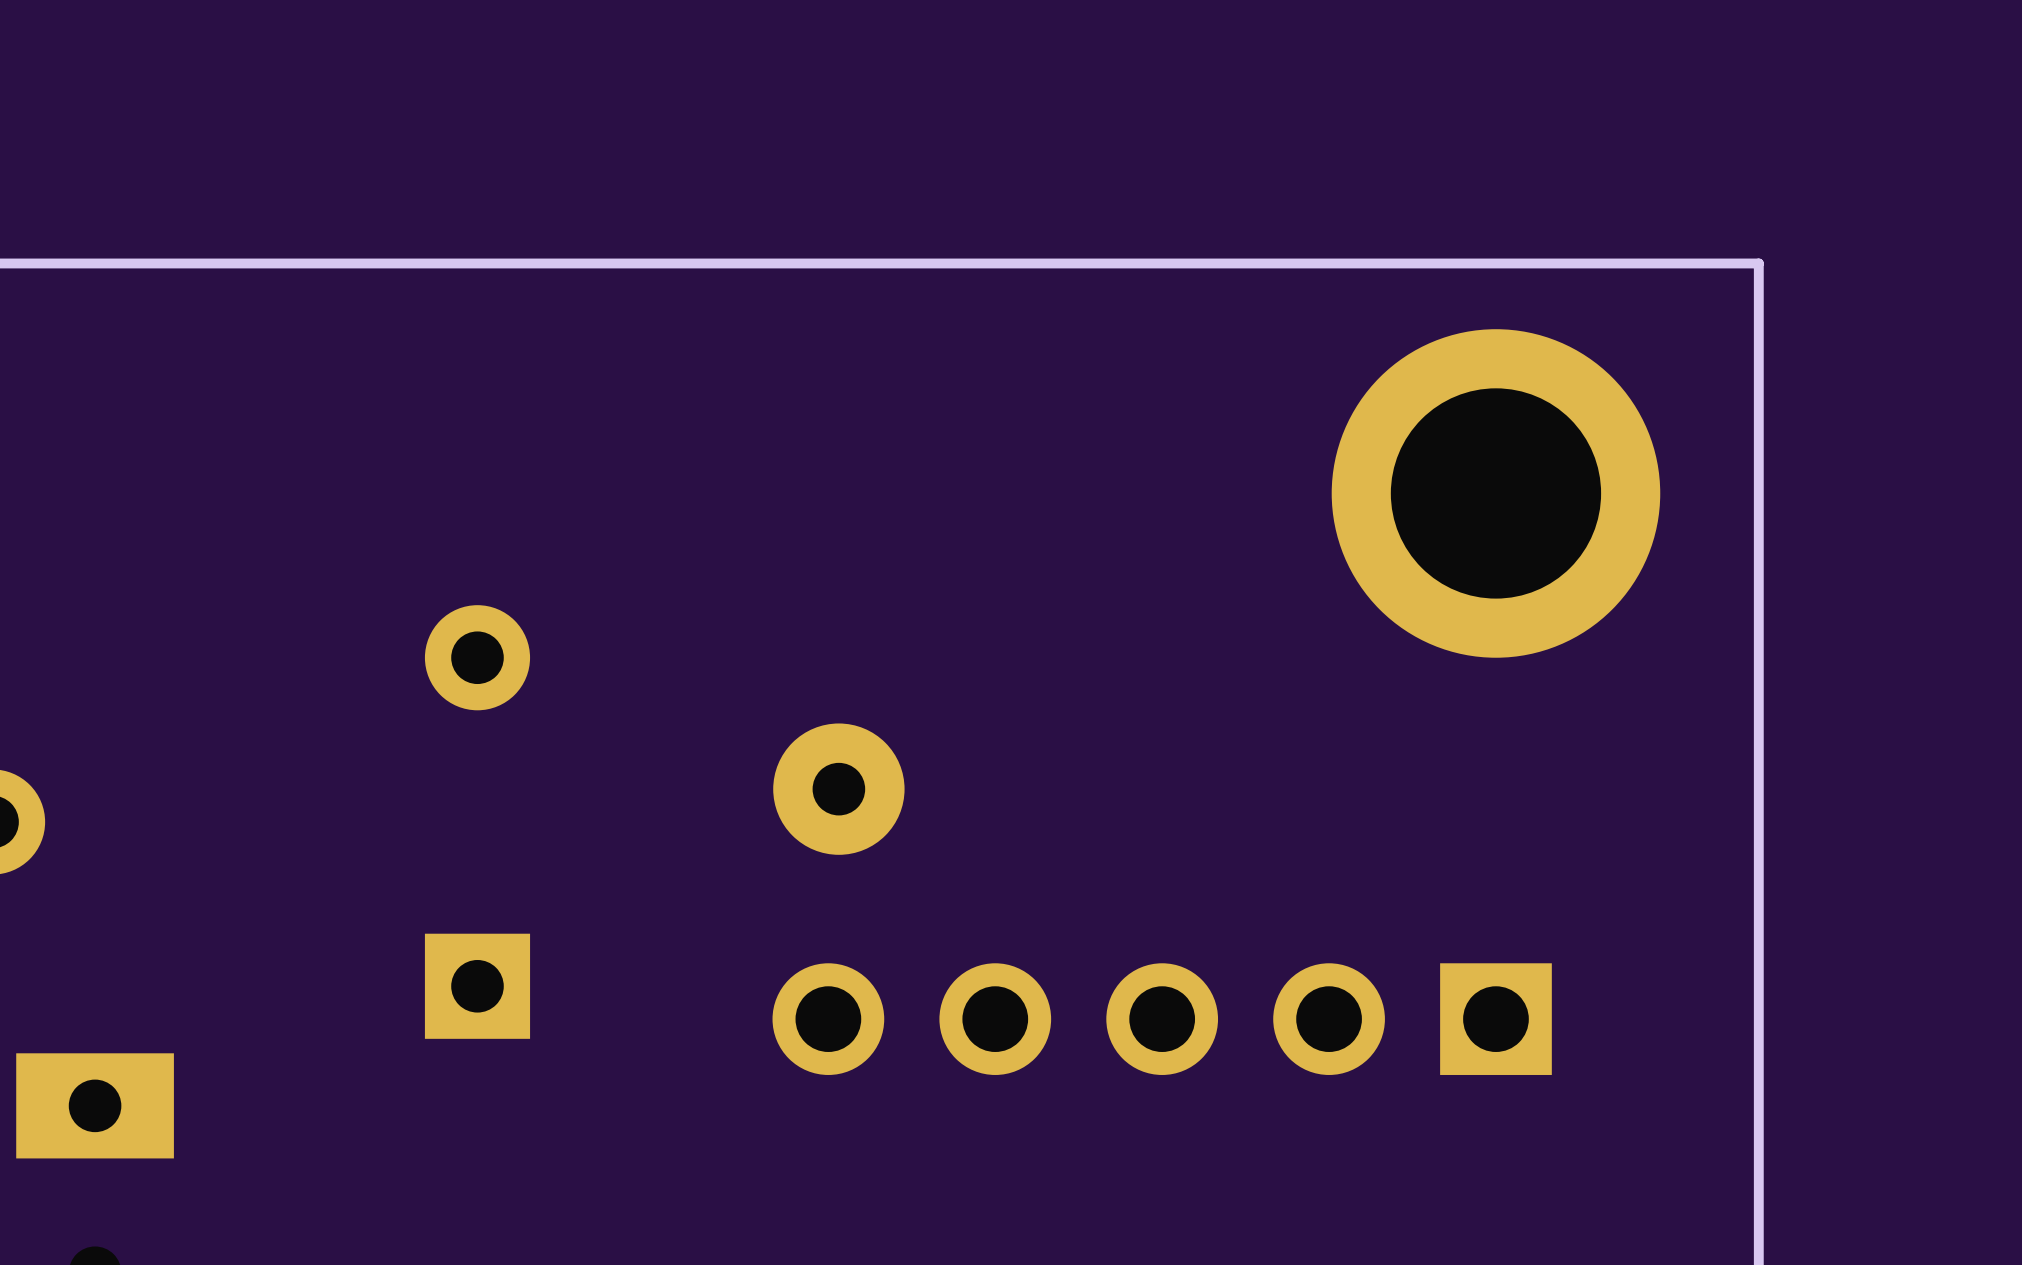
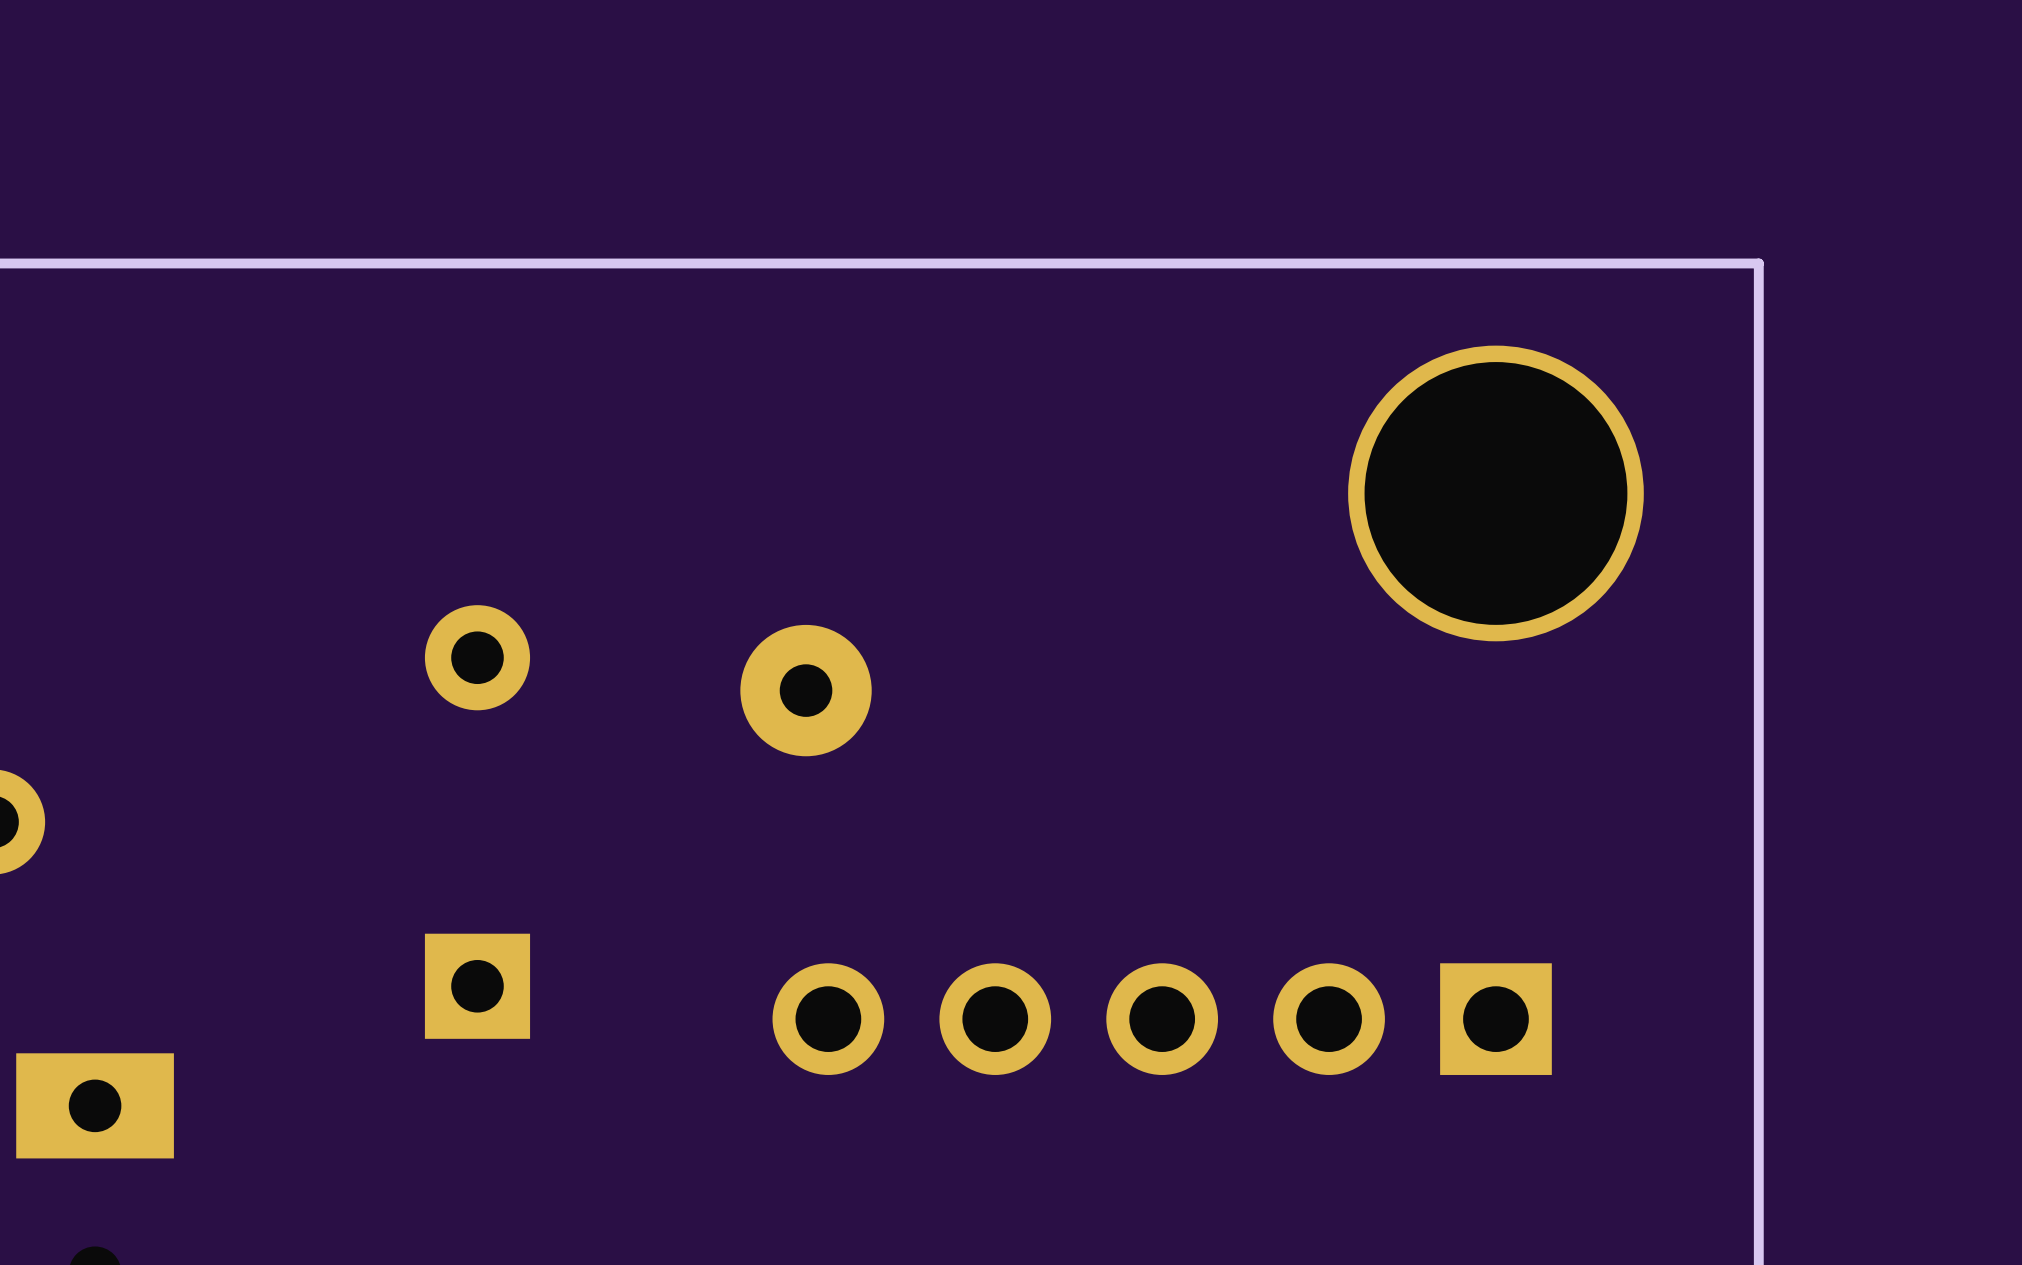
part footprint: [1331, 329, 1661, 658] -> [1348, 345, 1644, 642]
part position: (838, 789) -> (806, 690)

